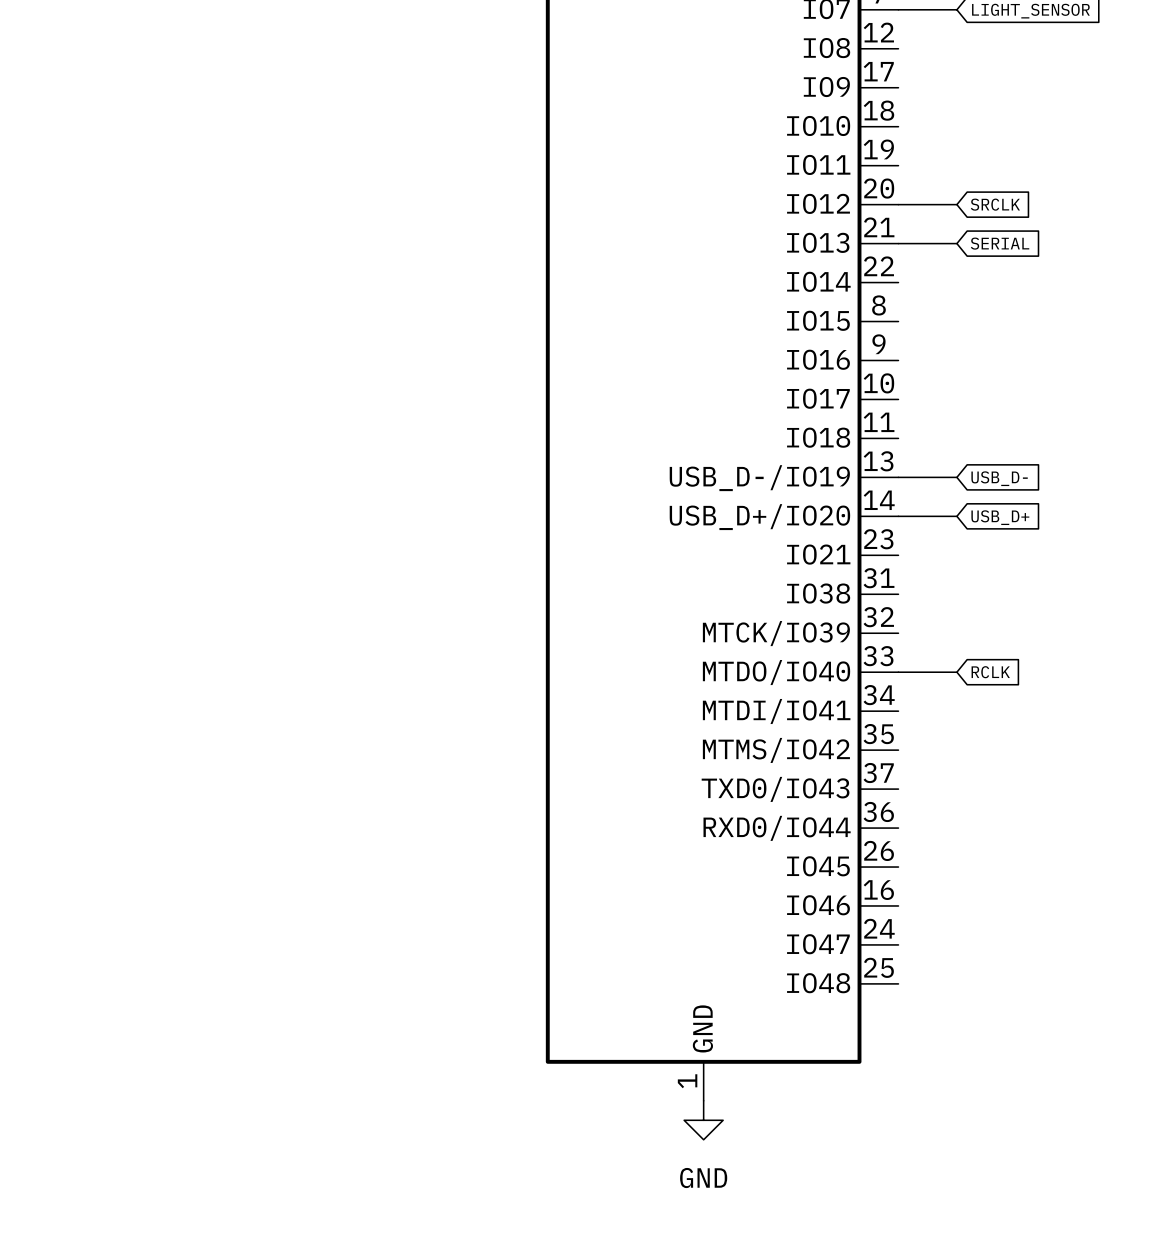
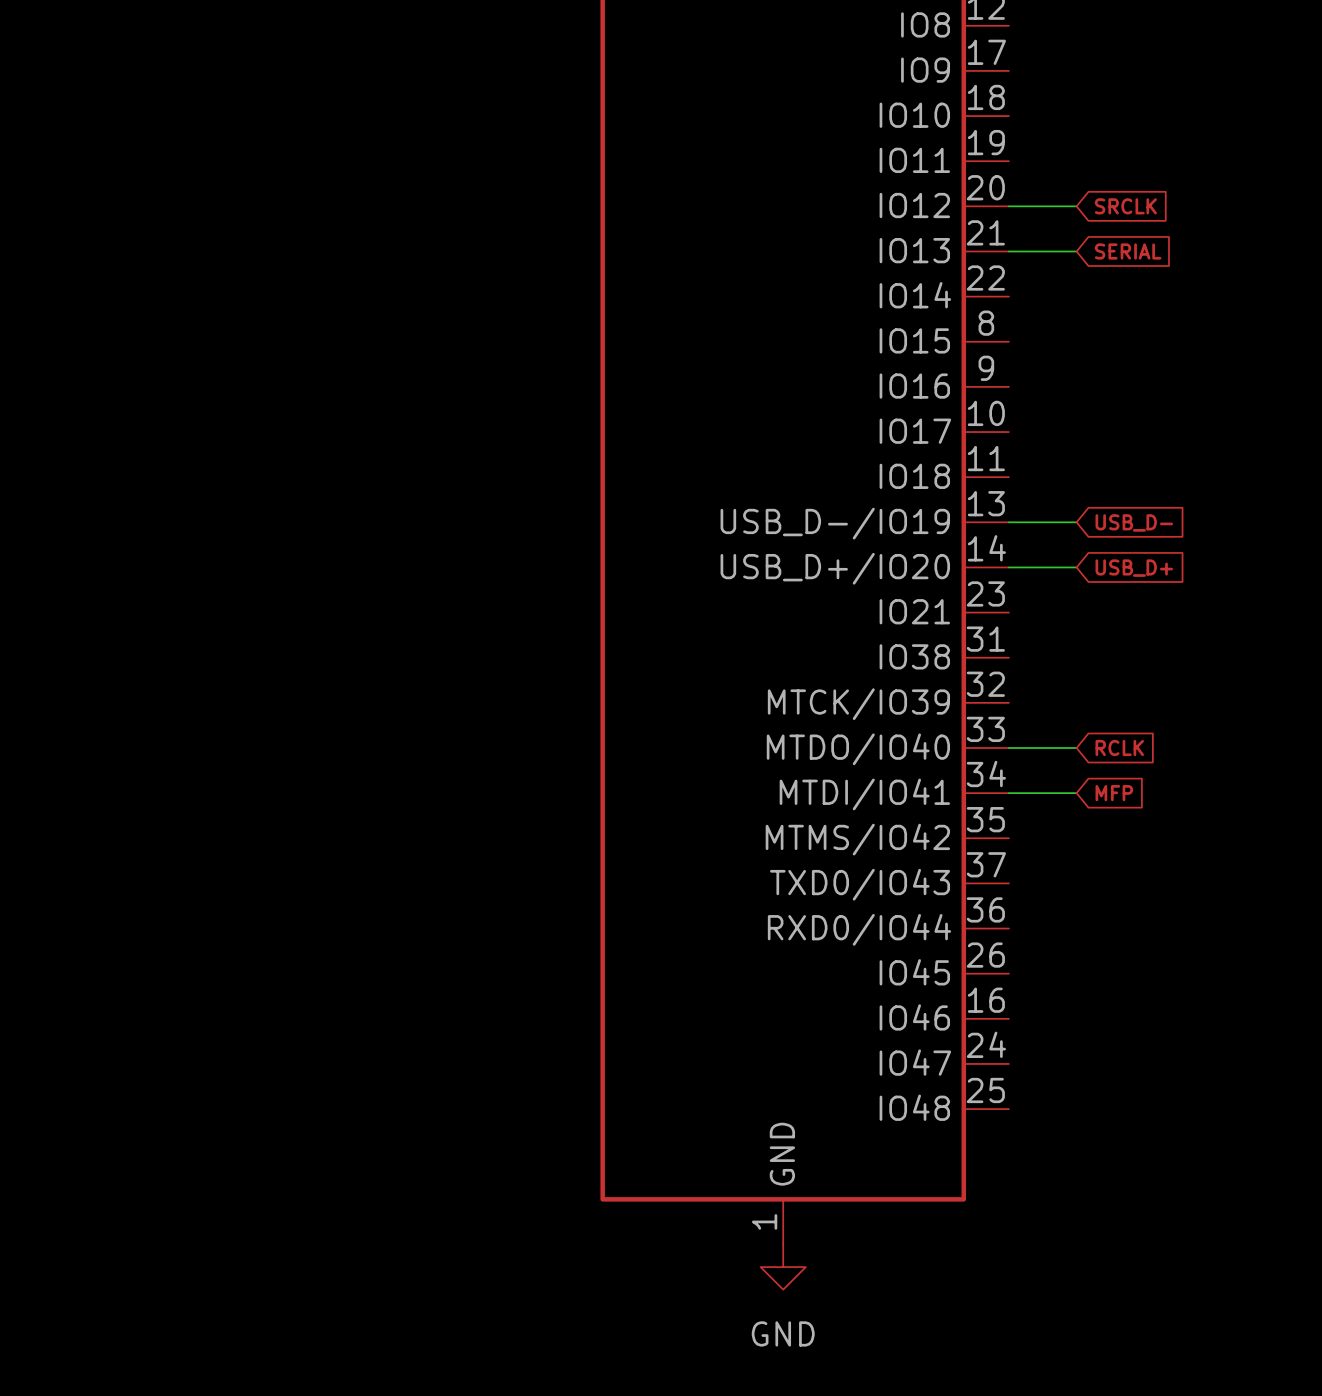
wire: none -> (1008, 793) (1076, 793)
global label: none -> MFP (1114, 793)

